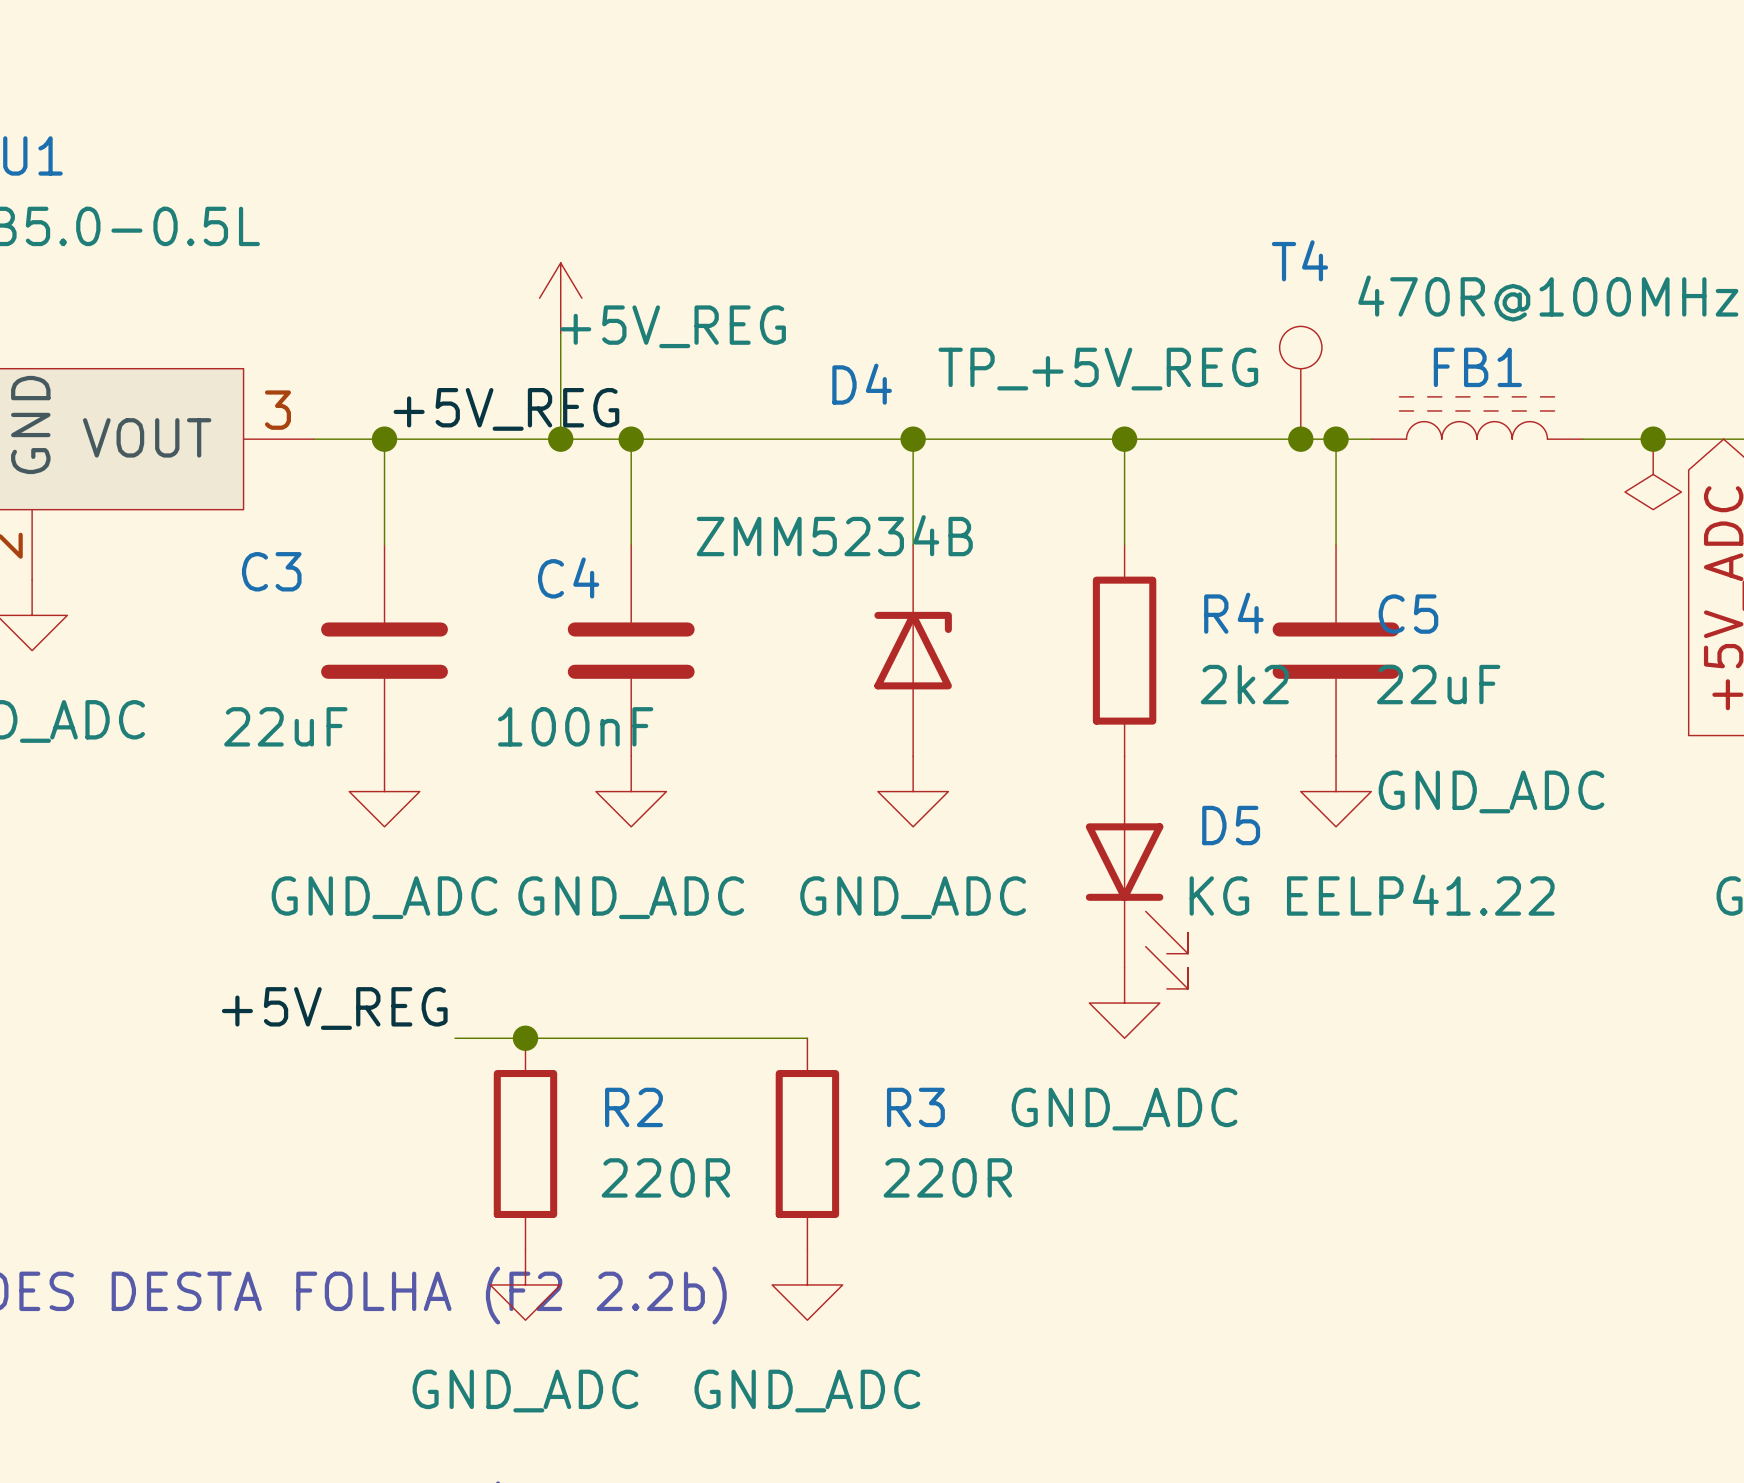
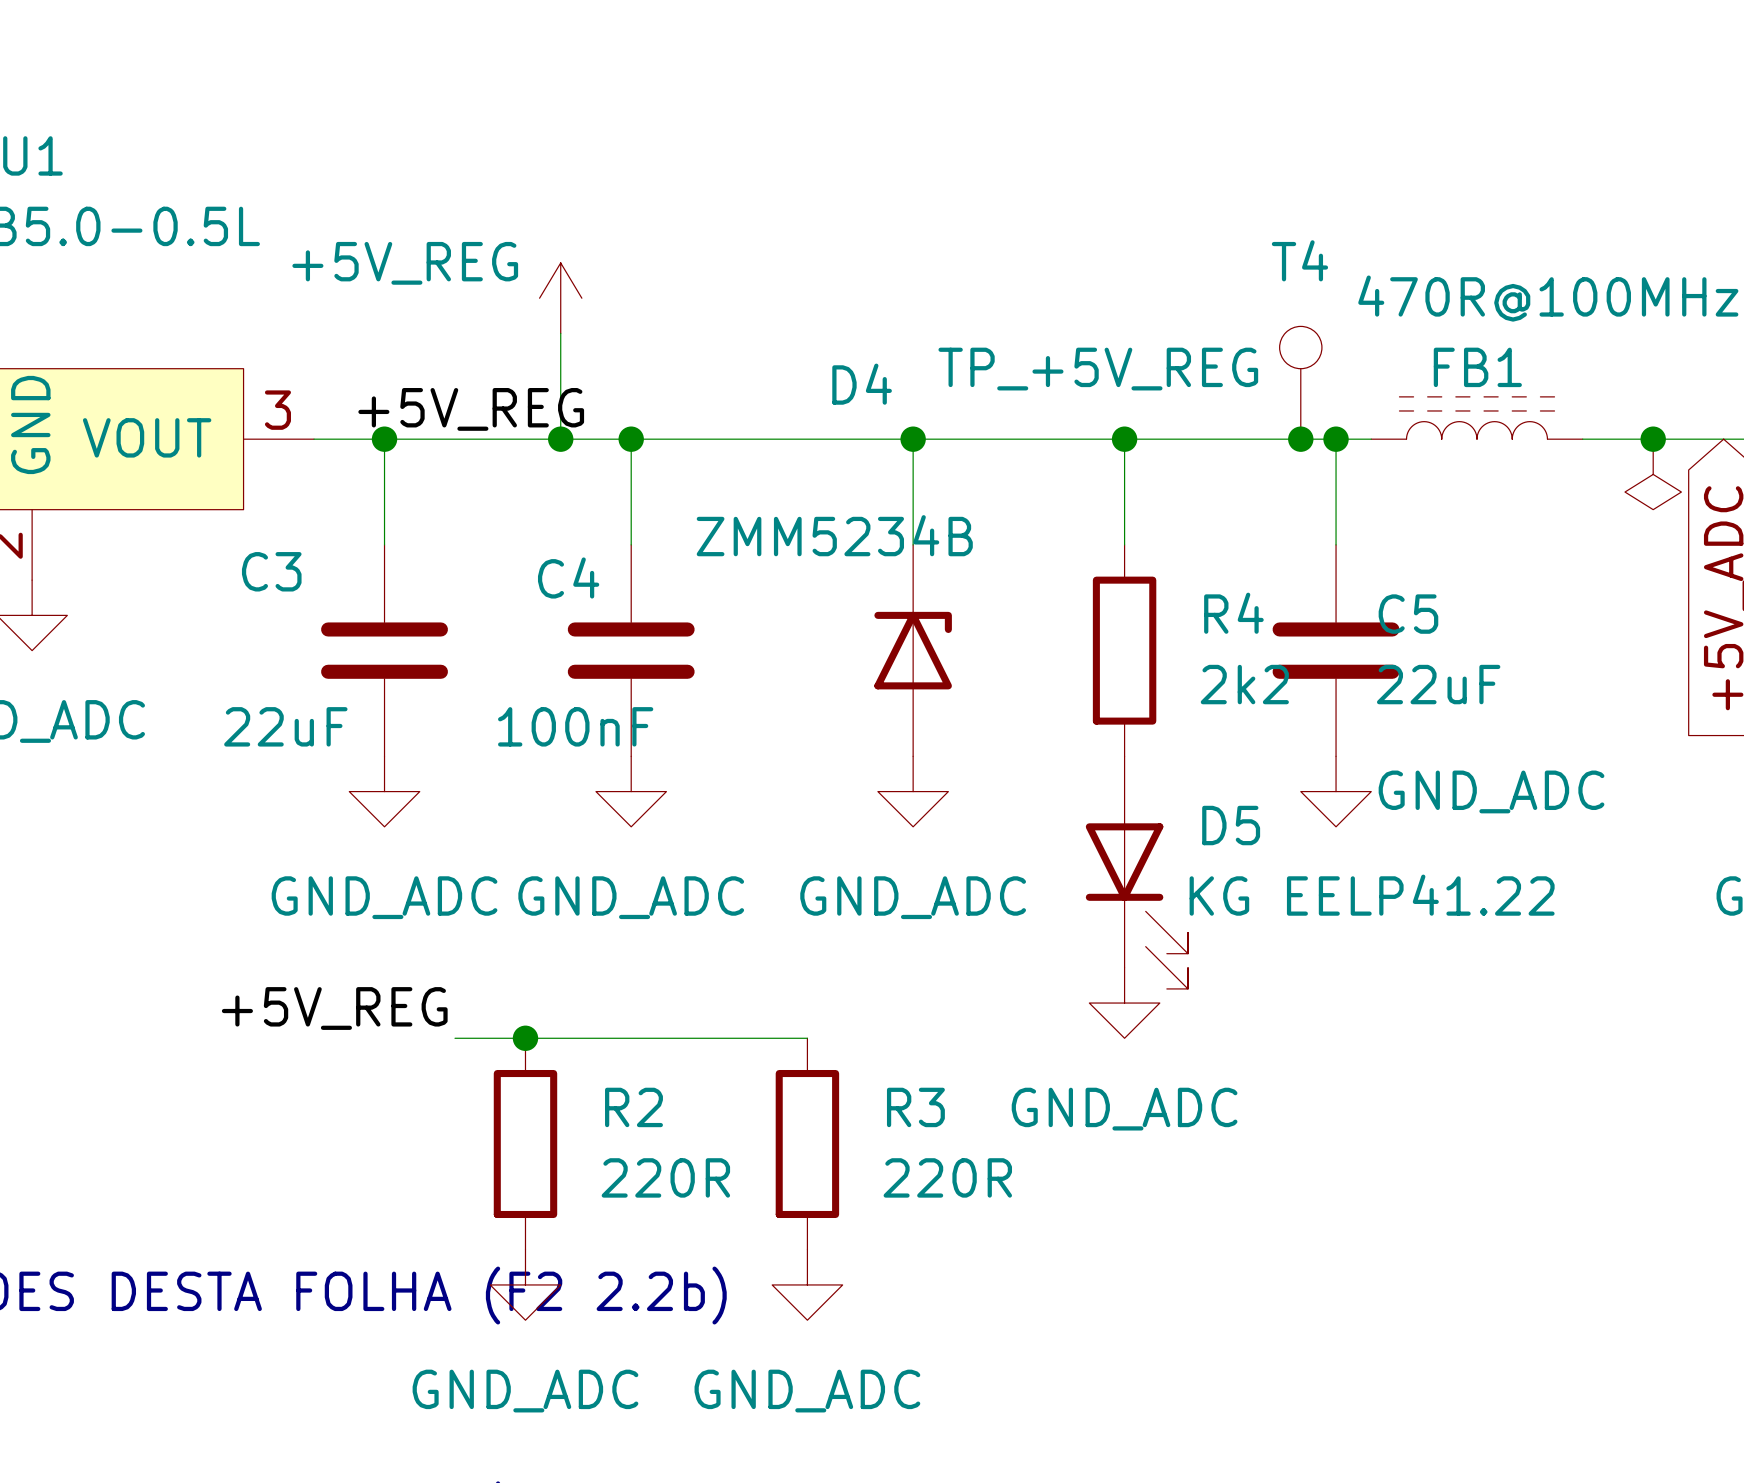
power symbol text position: +5V_REG (673, 326) -> +5V_REG (405, 263)
label position: +5V_REG (506, 409) -> +5V_REG (471, 409)

